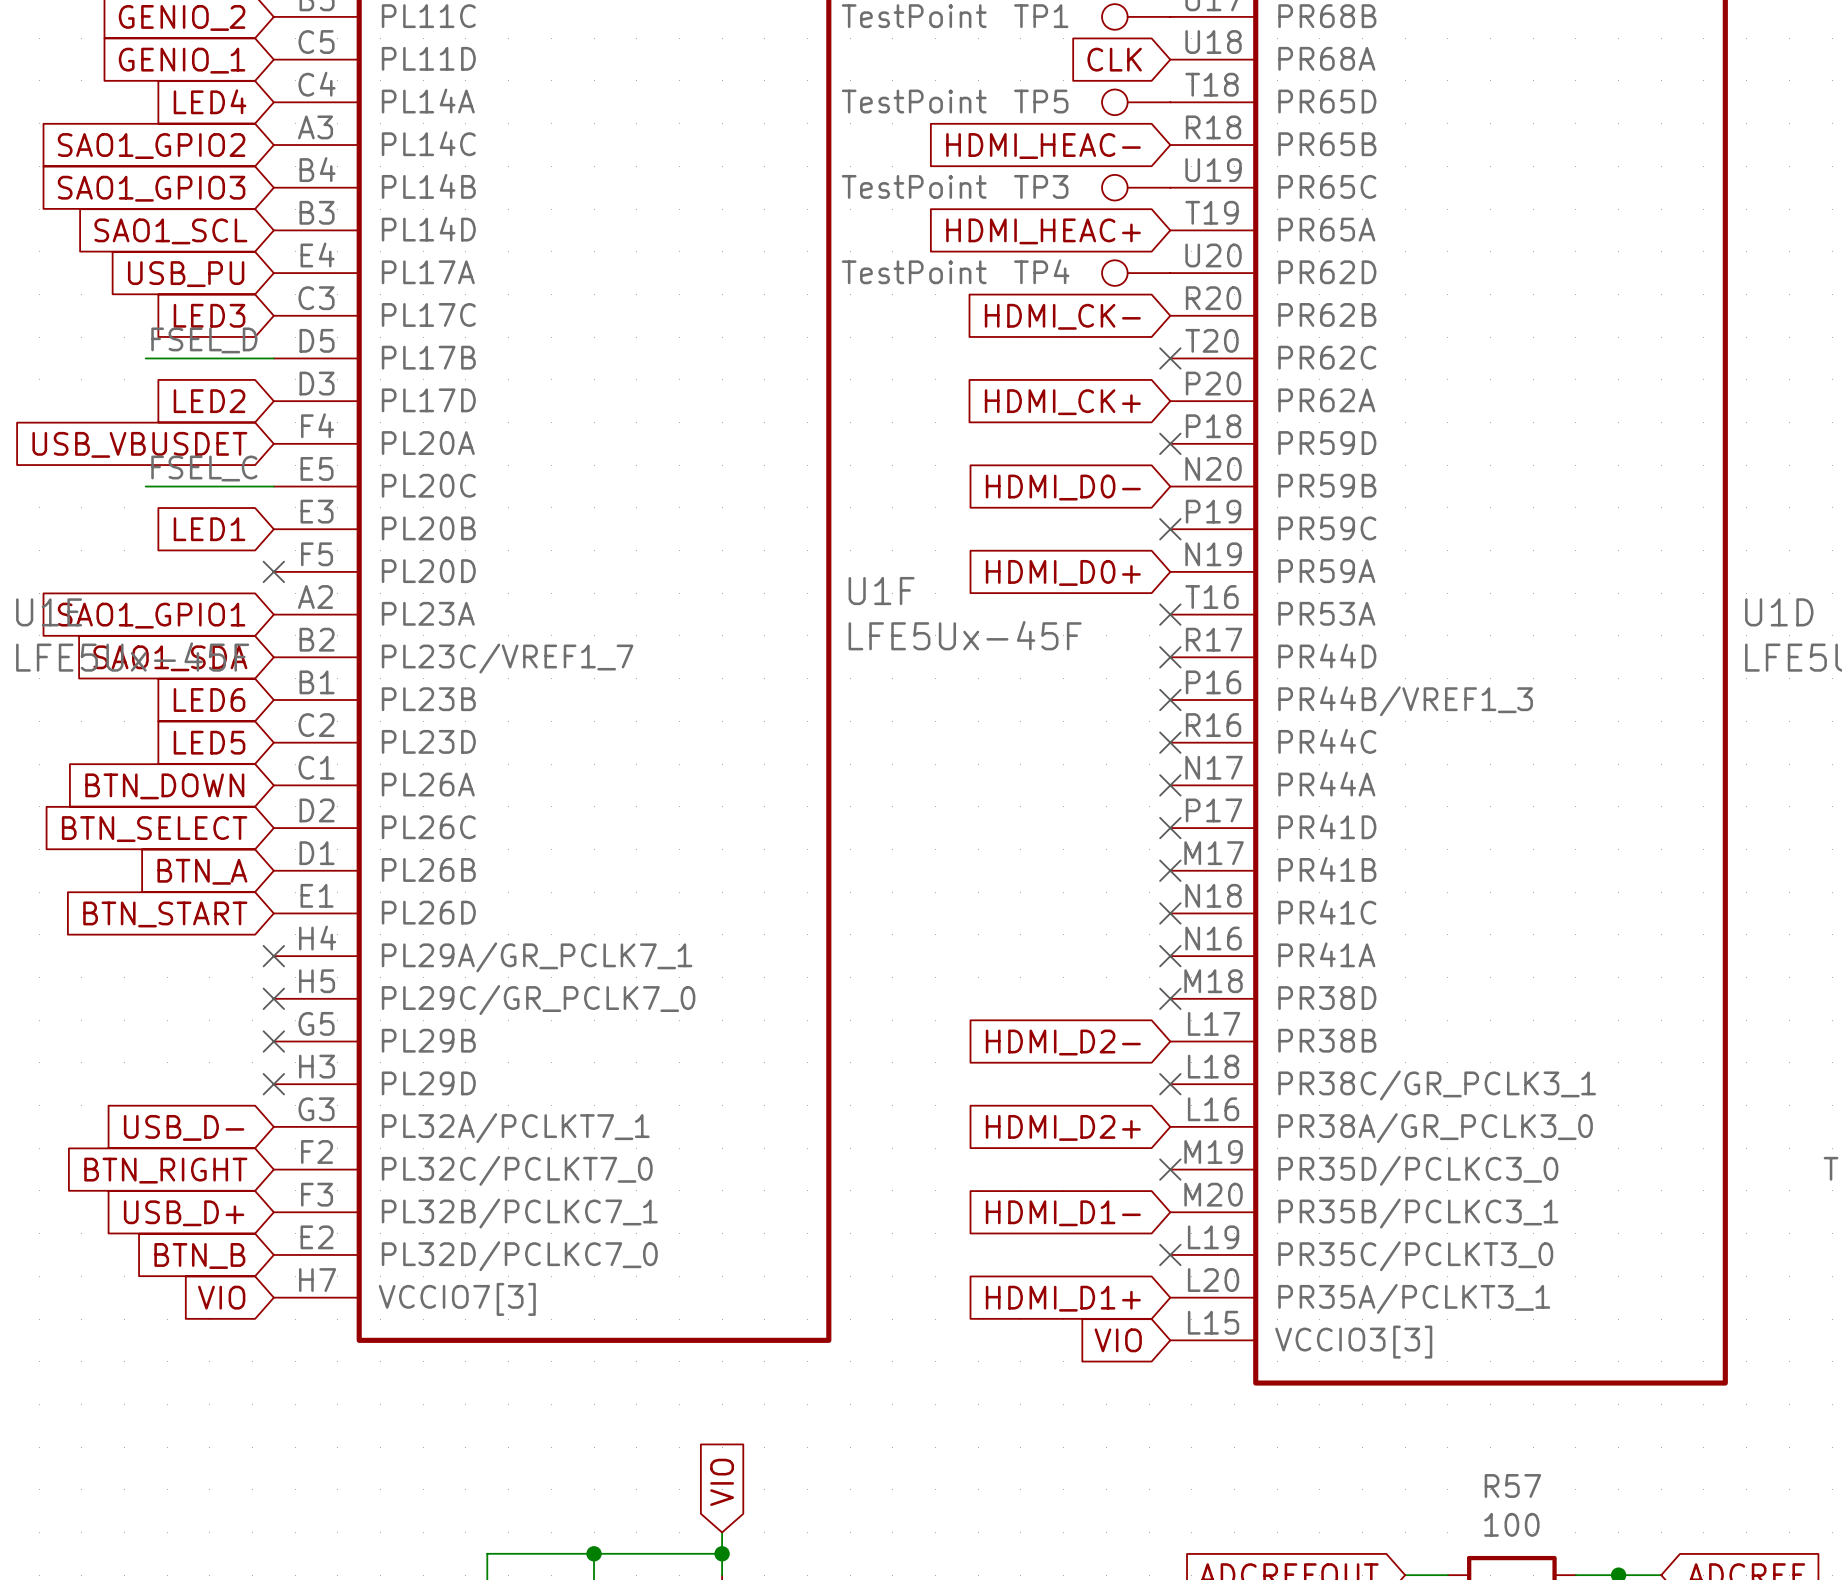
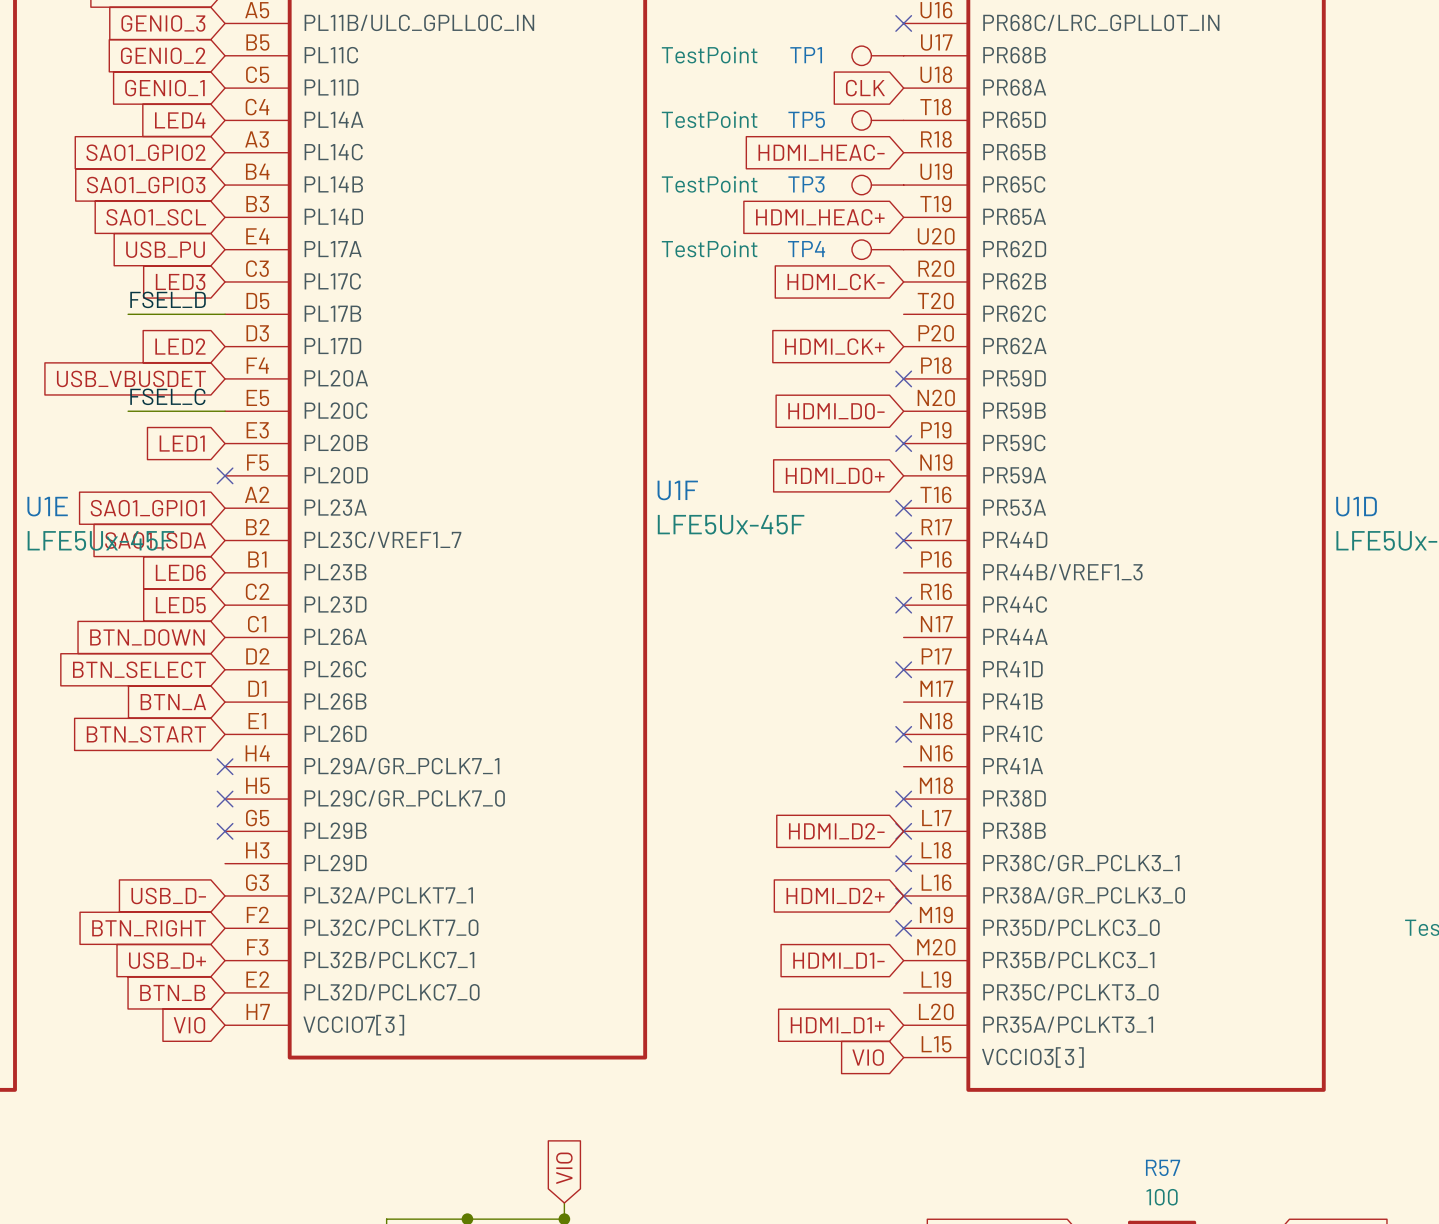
no-connect mark: (1170, 358) -> none
no-connect mark: (1170, 699) -> none
no-connect mark: (1170, 785) -> none
no-connect mark: (1170, 870) -> none
no-connect mark: (1170, 956) -> none
no-connect mark: none -> (903, 831)
no-connect mark: (273, 1084) -> none
no-connect mark: none -> (903, 895)
no-connect mark: (1170, 1254) -> none

